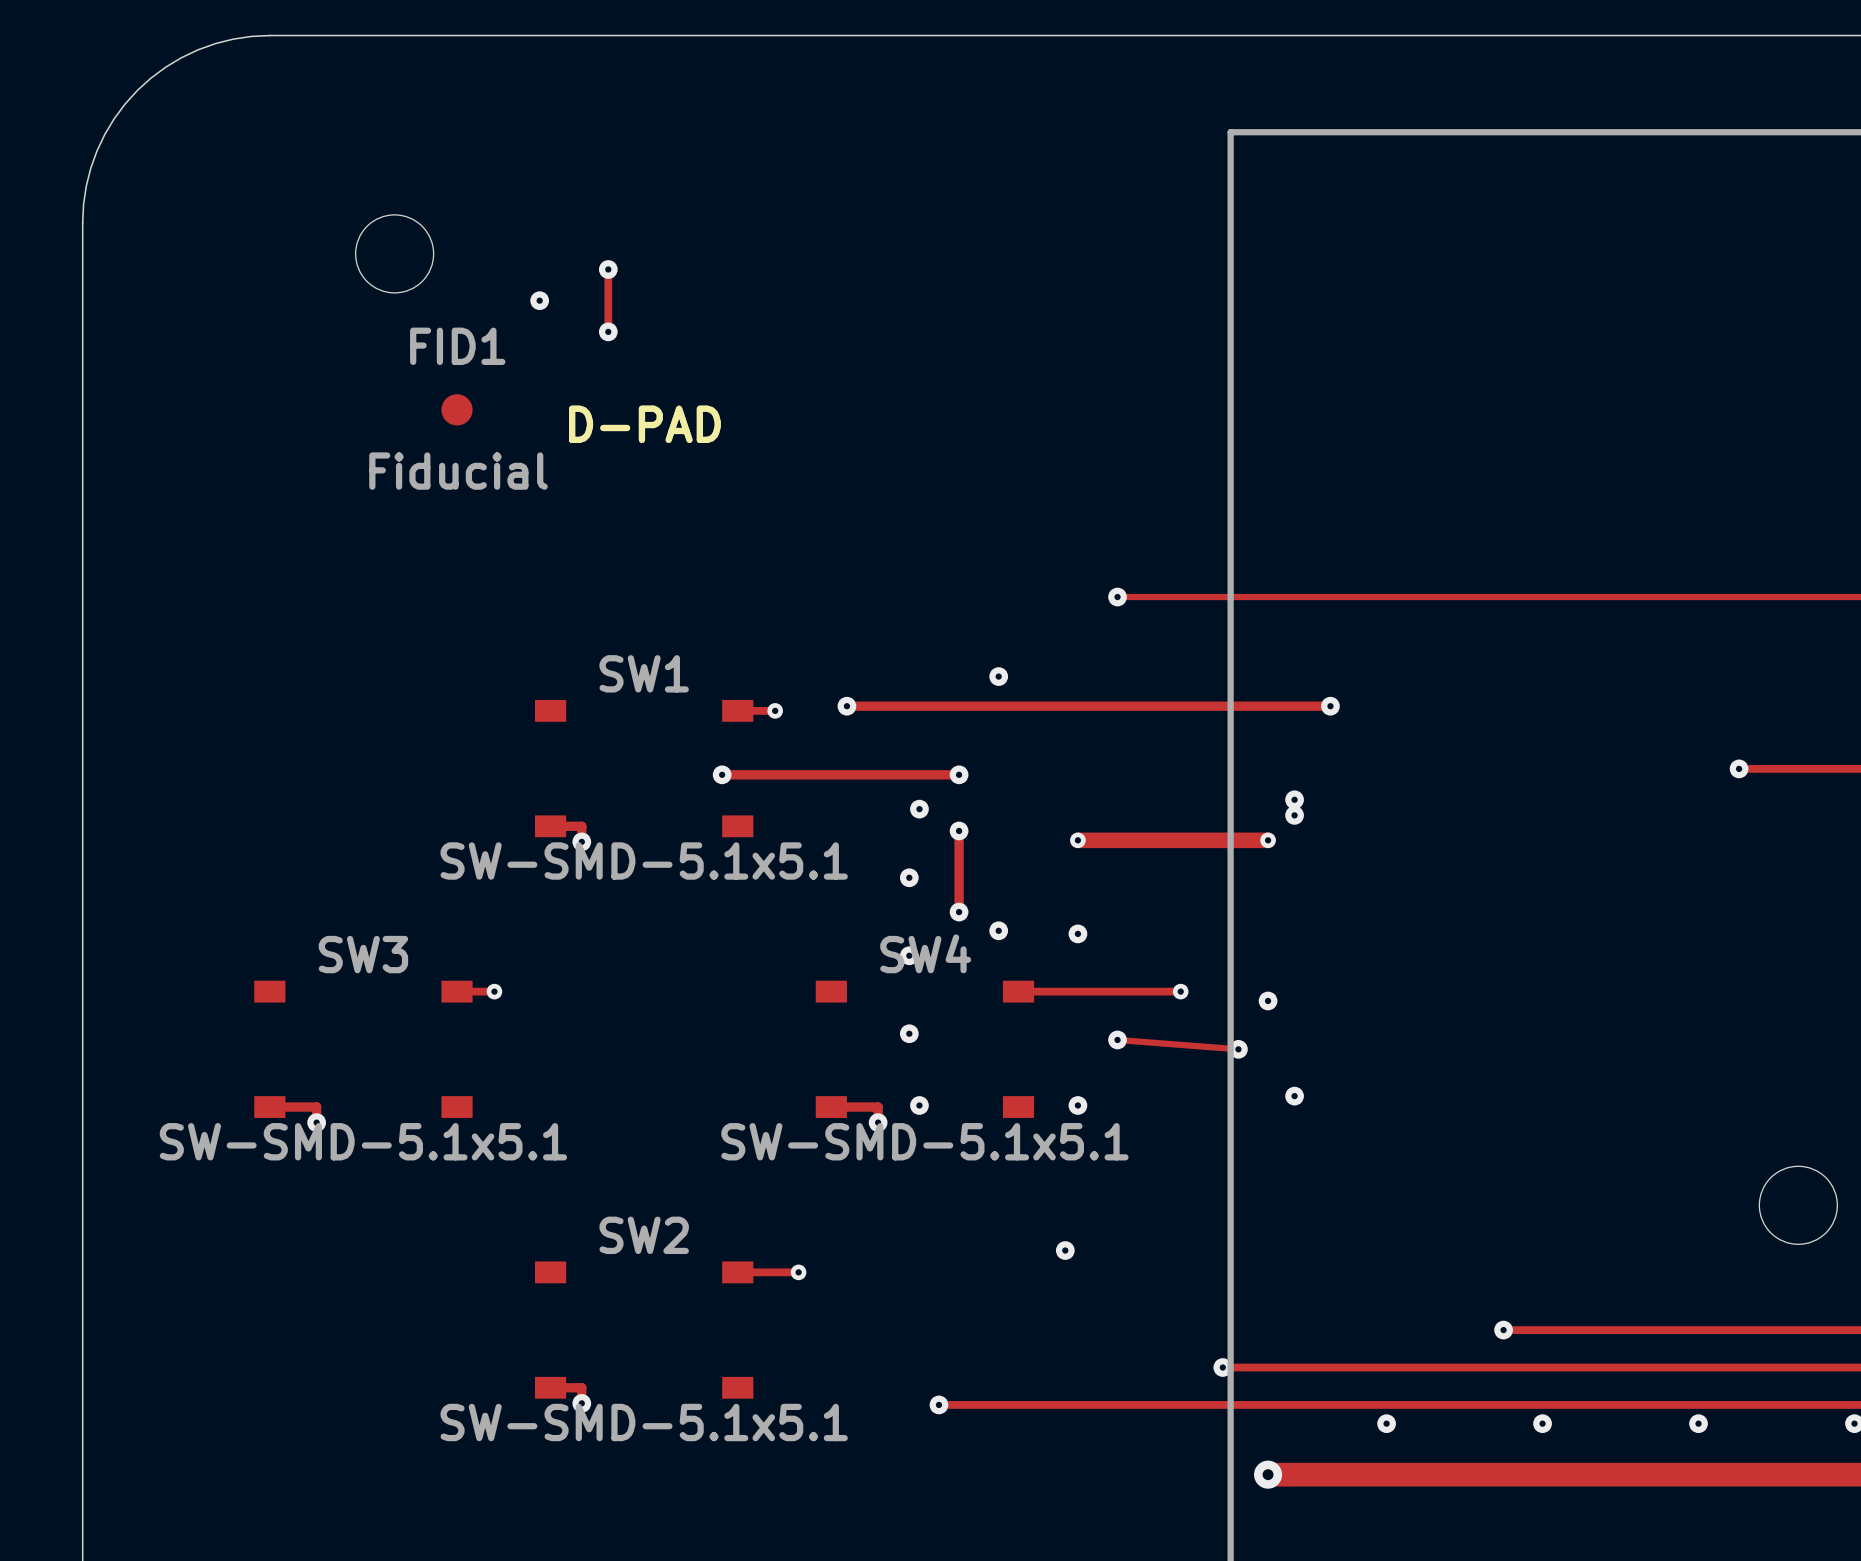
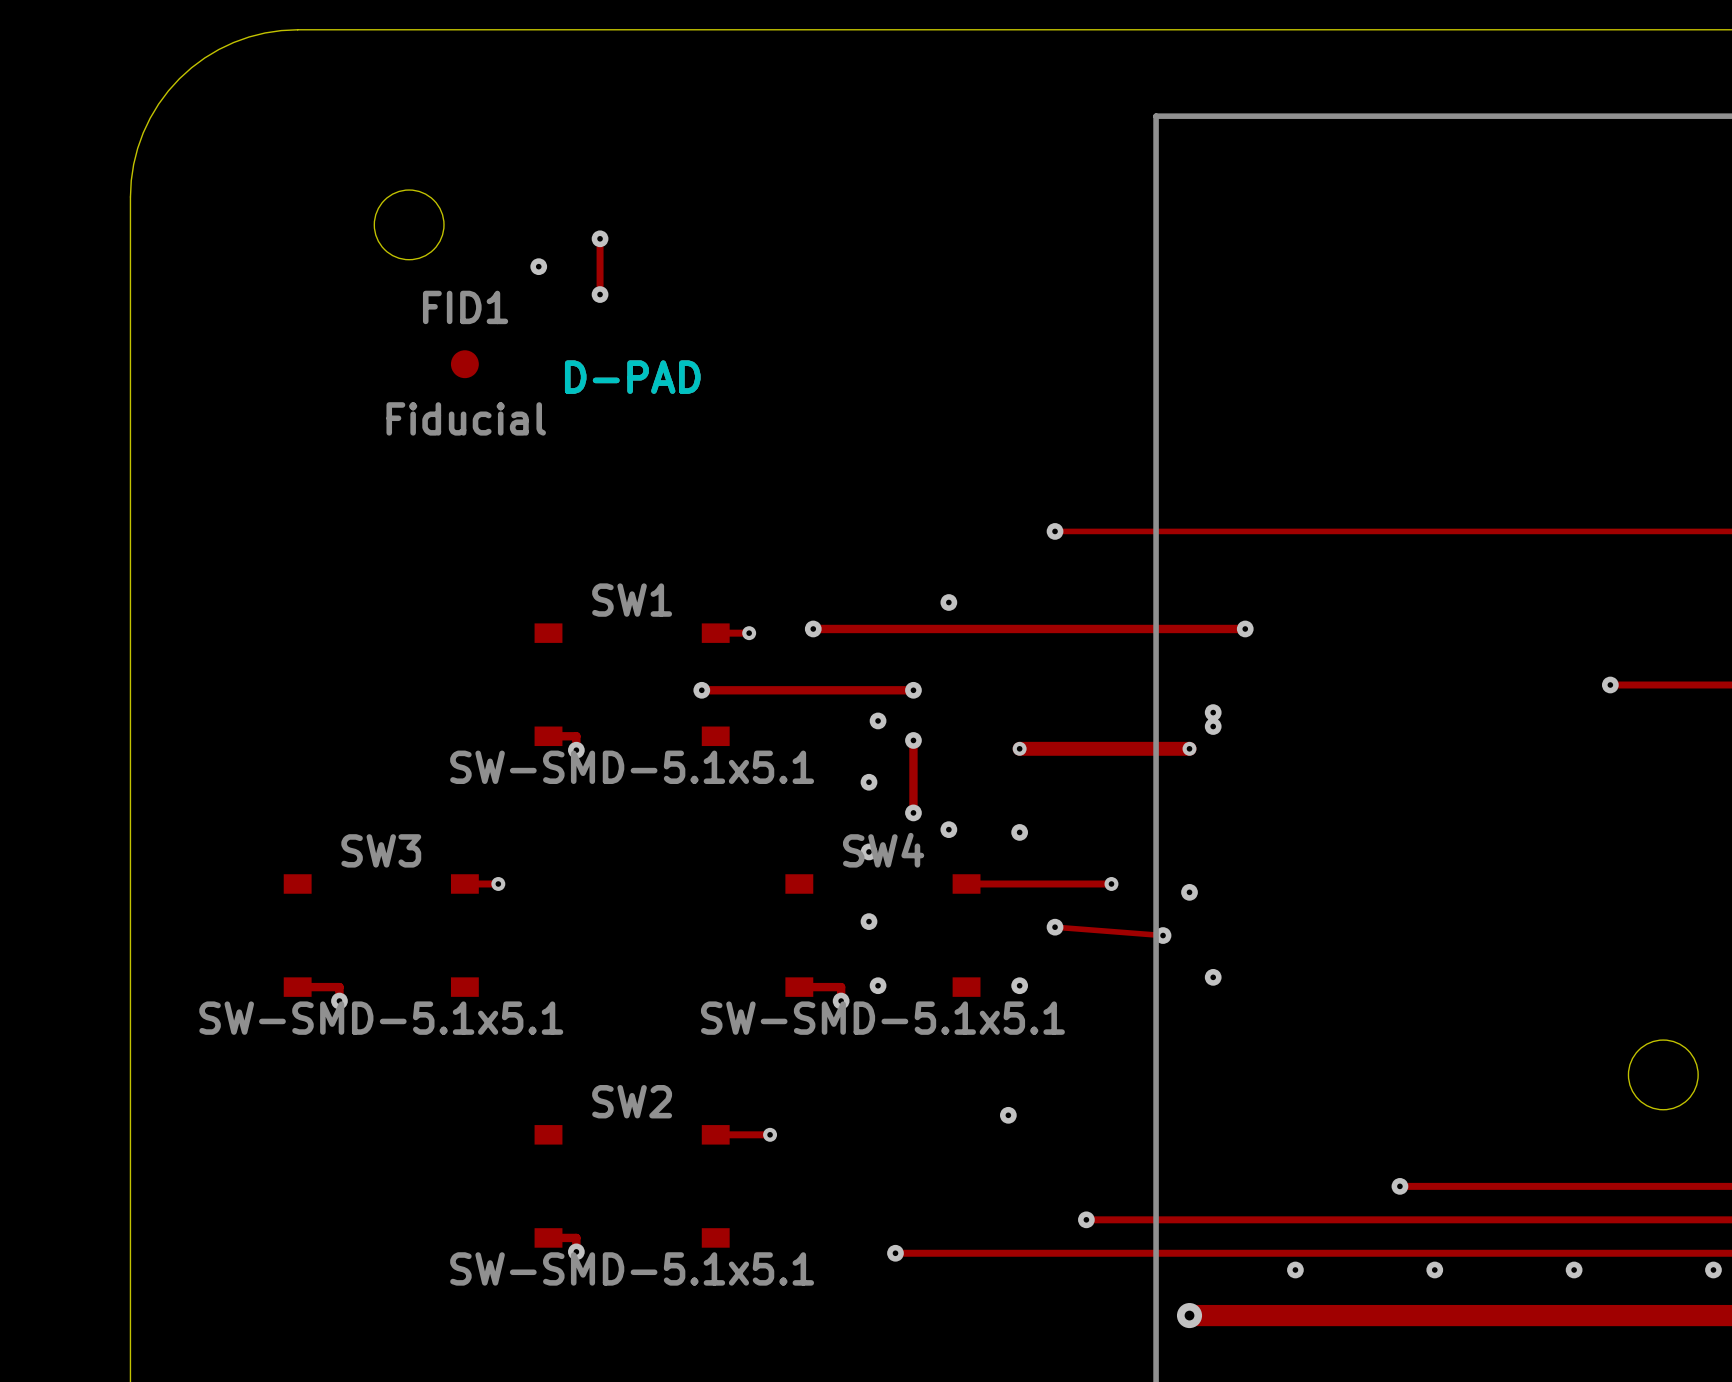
track: none -> (1086, 1219) (1149, 1219)
via position: (1222, 1367) -> (1086, 1219)

